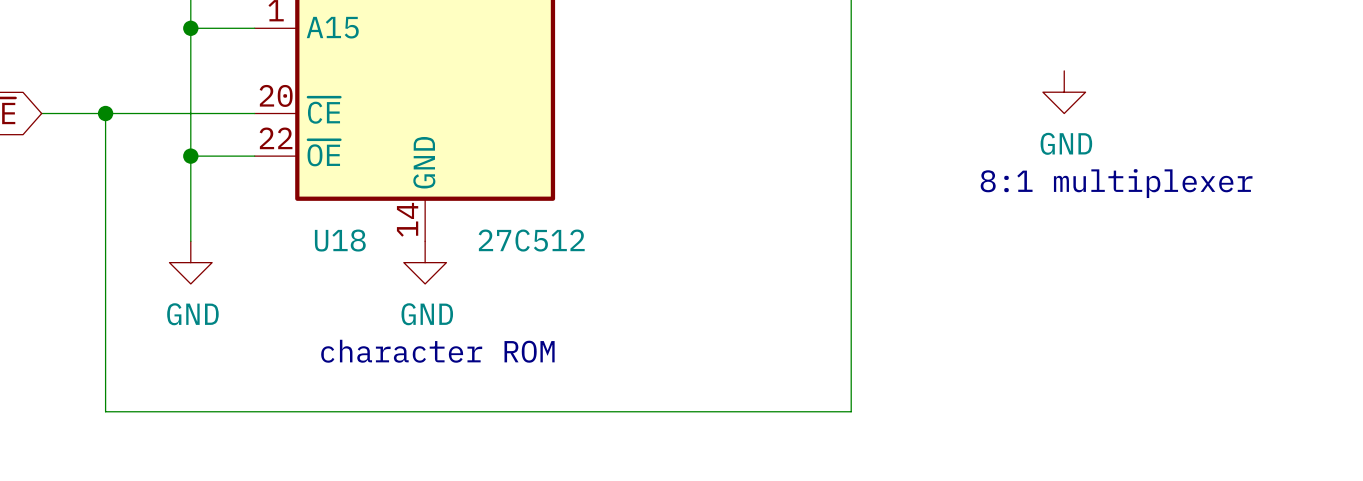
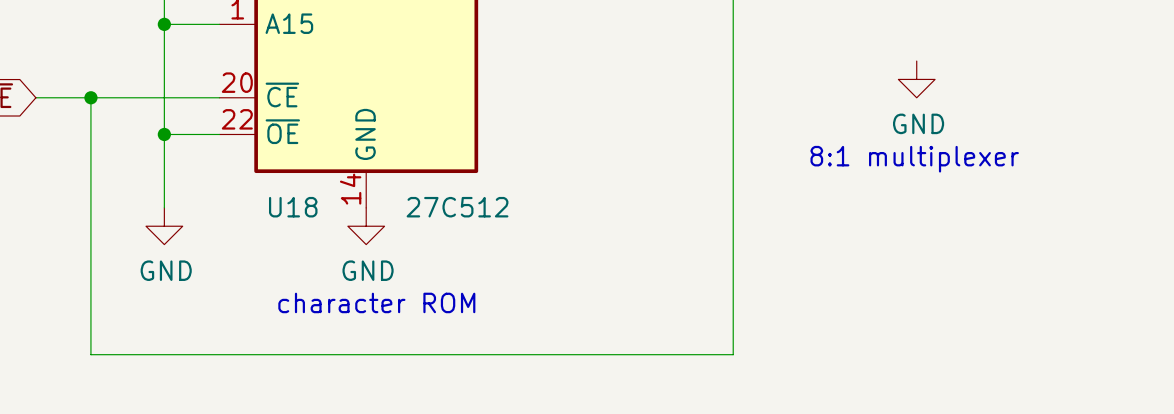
text position: 8:1 multiplexer (1116, 183) -> 8:1 multiplexer (914, 159)

